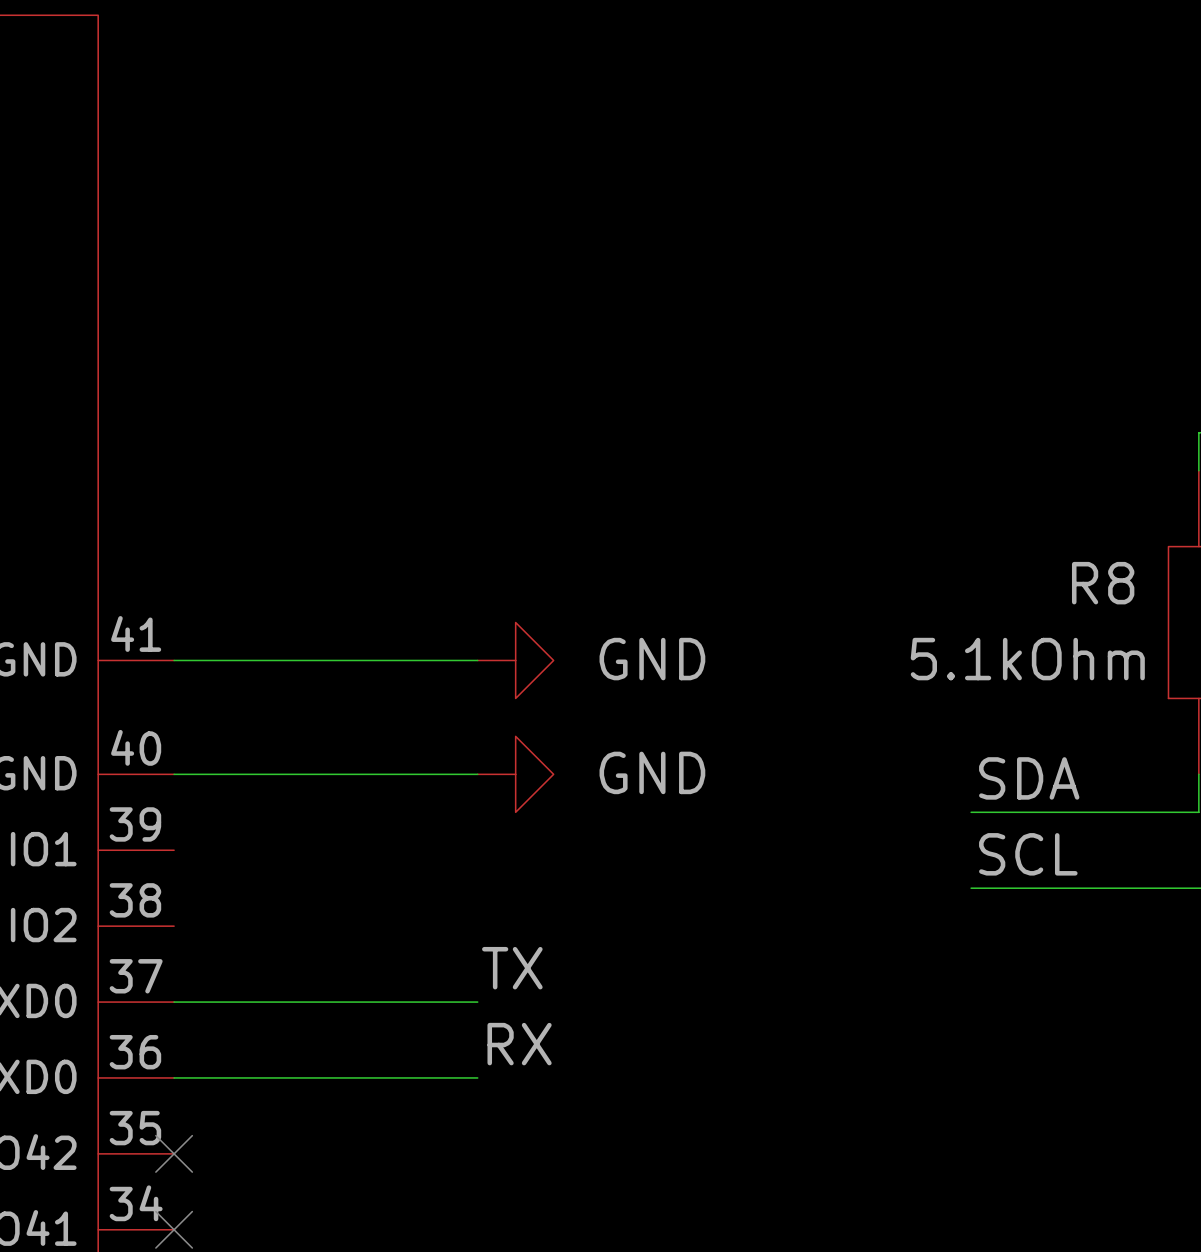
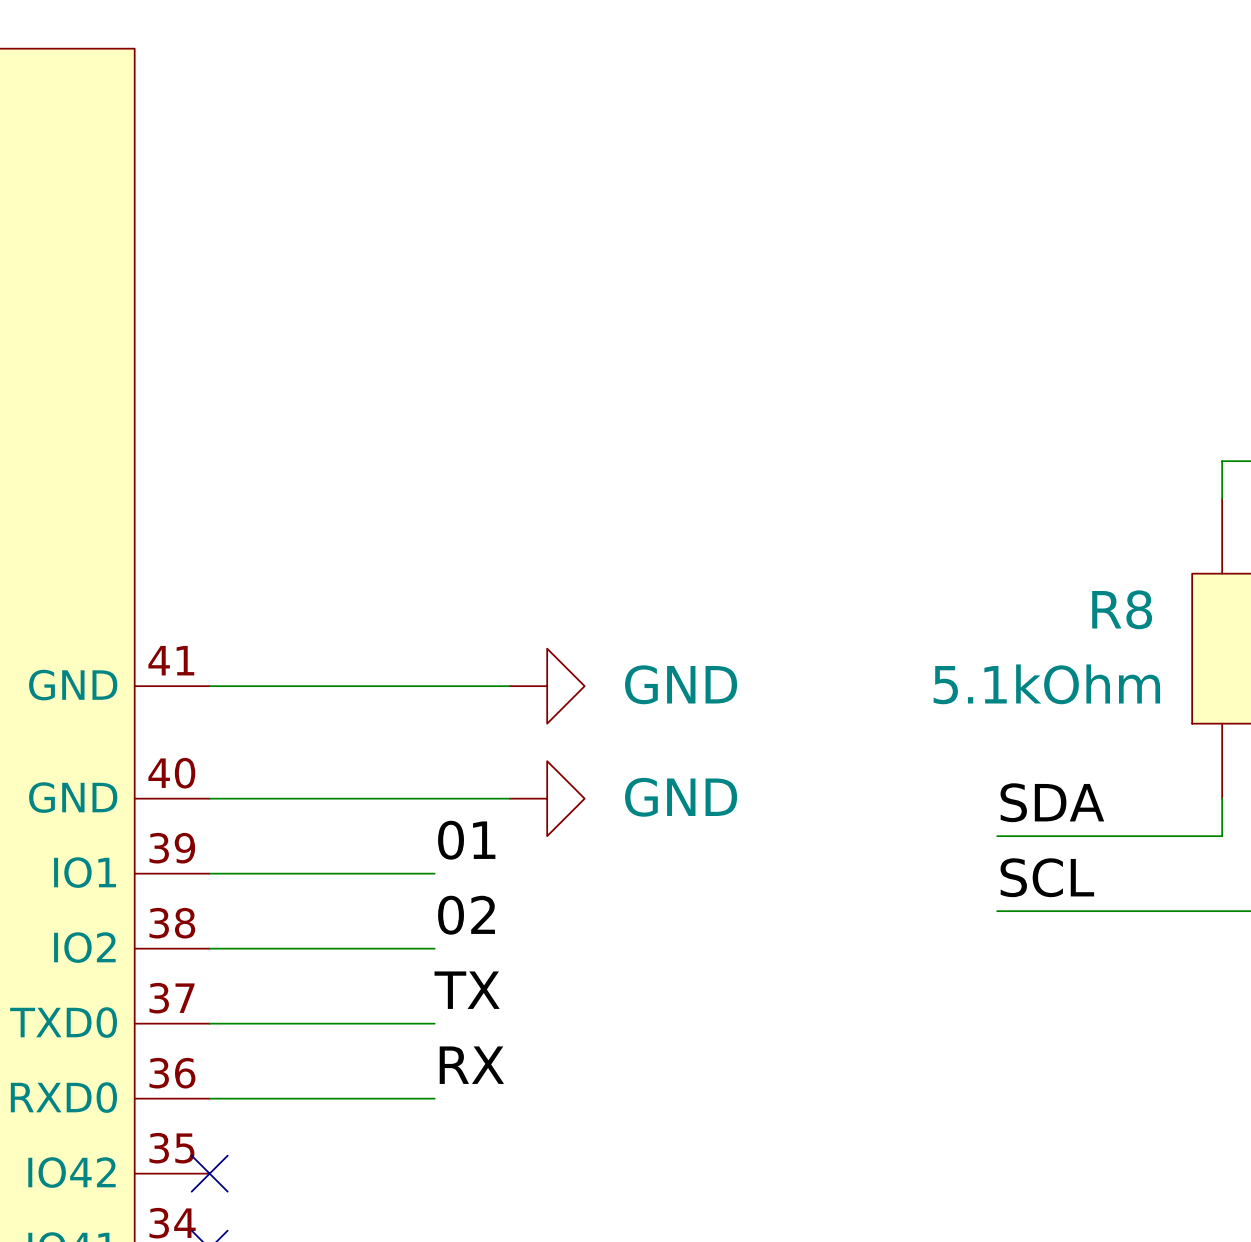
label: none -> 01 (466, 840)
wire: none -> (209, 873) (434, 873)
label: none -> 02 (466, 915)
wire: none -> (209, 948) (434, 948)
label position: TX (512, 968) -> TX (467, 990)
wire: (401, 1002) (477, 1002) -> none
label position: RX (519, 1044) -> RX (471, 1065)
wire: (401, 1077) (477, 1077) -> none

